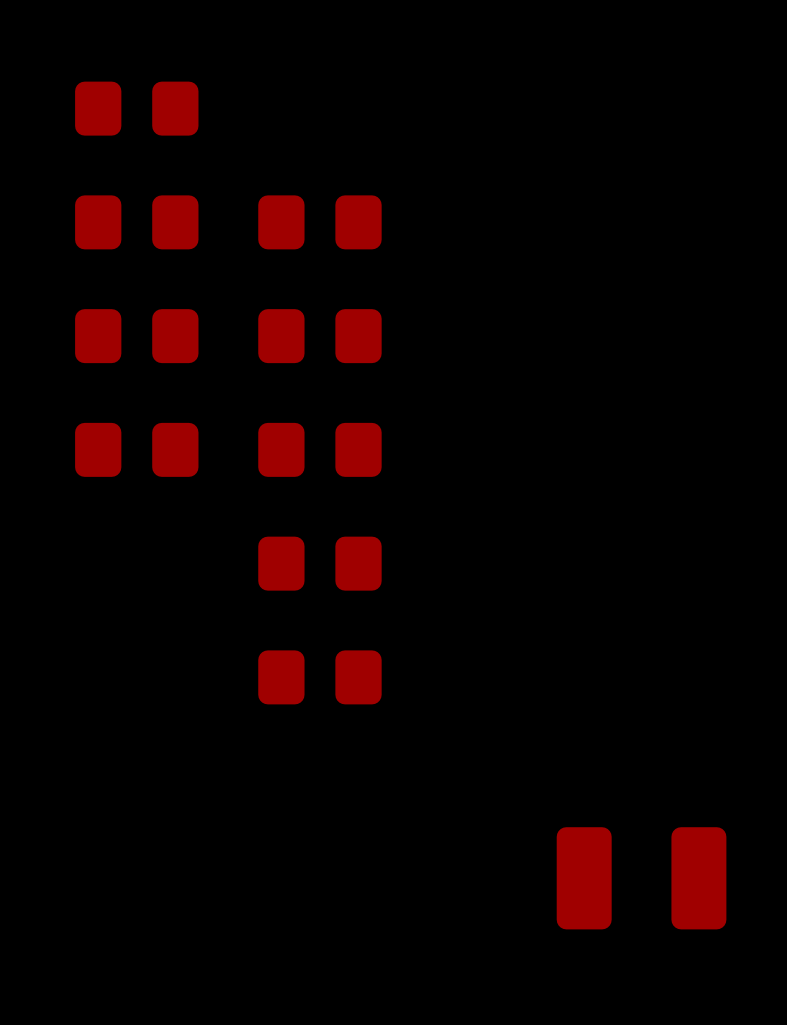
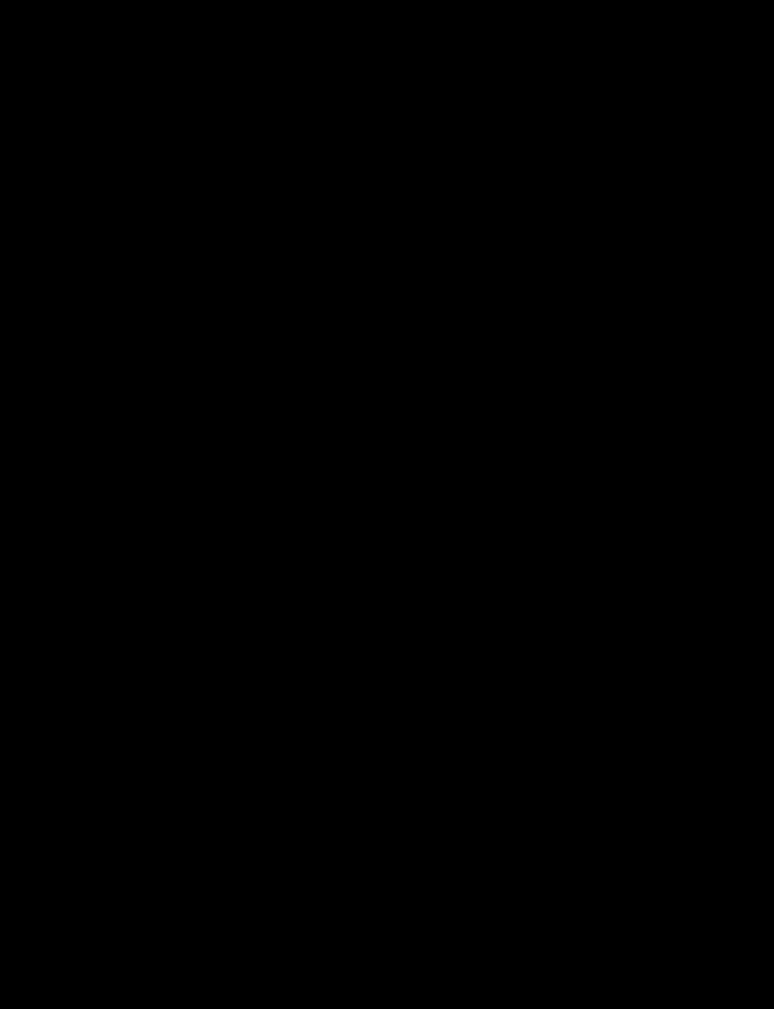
part: (136, 108) -> none
part: (136, 222) -> none
part: (319, 222) -> none
part: (136, 336) -> none
part: (319, 336) -> none
part: (136, 449) -> none
part: (319, 449) -> none
part: (319, 563) -> none
part: (319, 677) -> none
part: (641, 878) -> none

